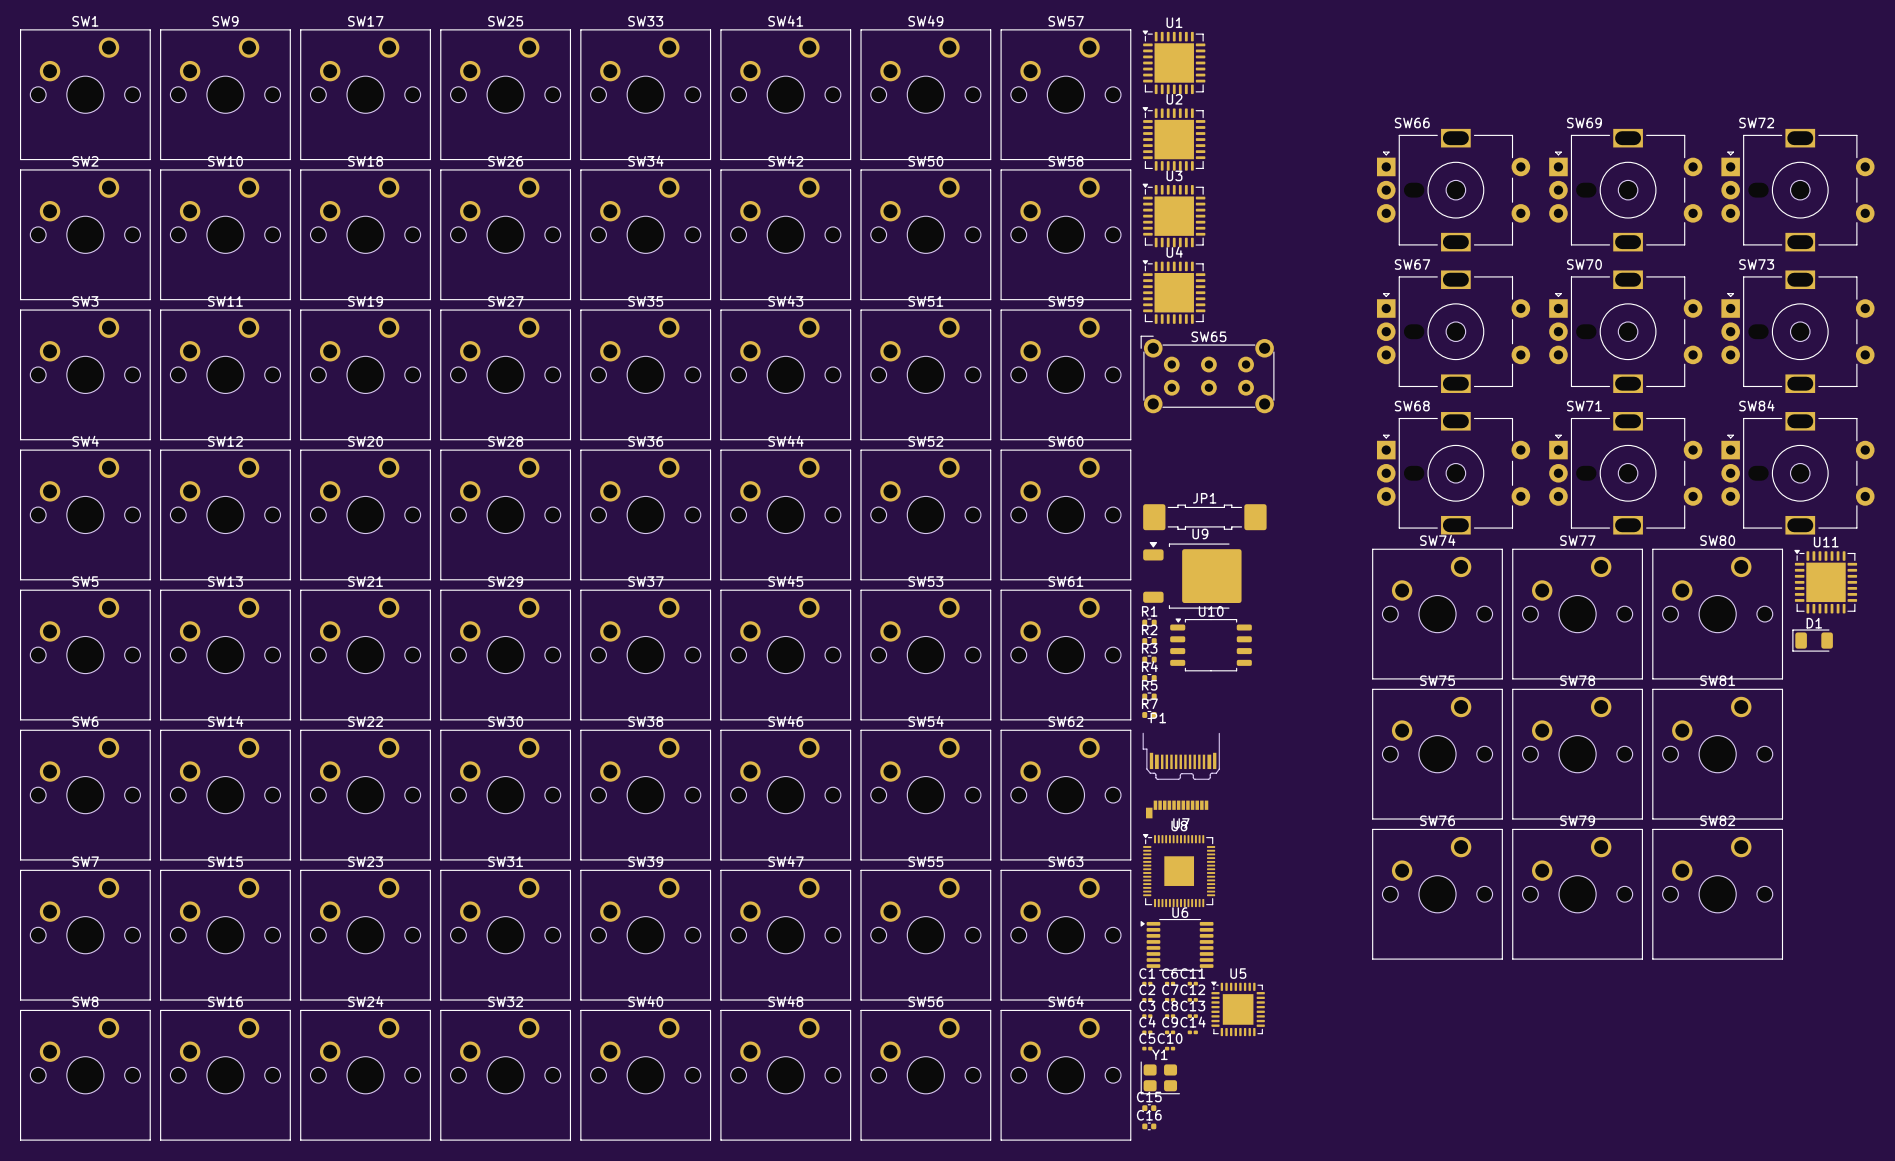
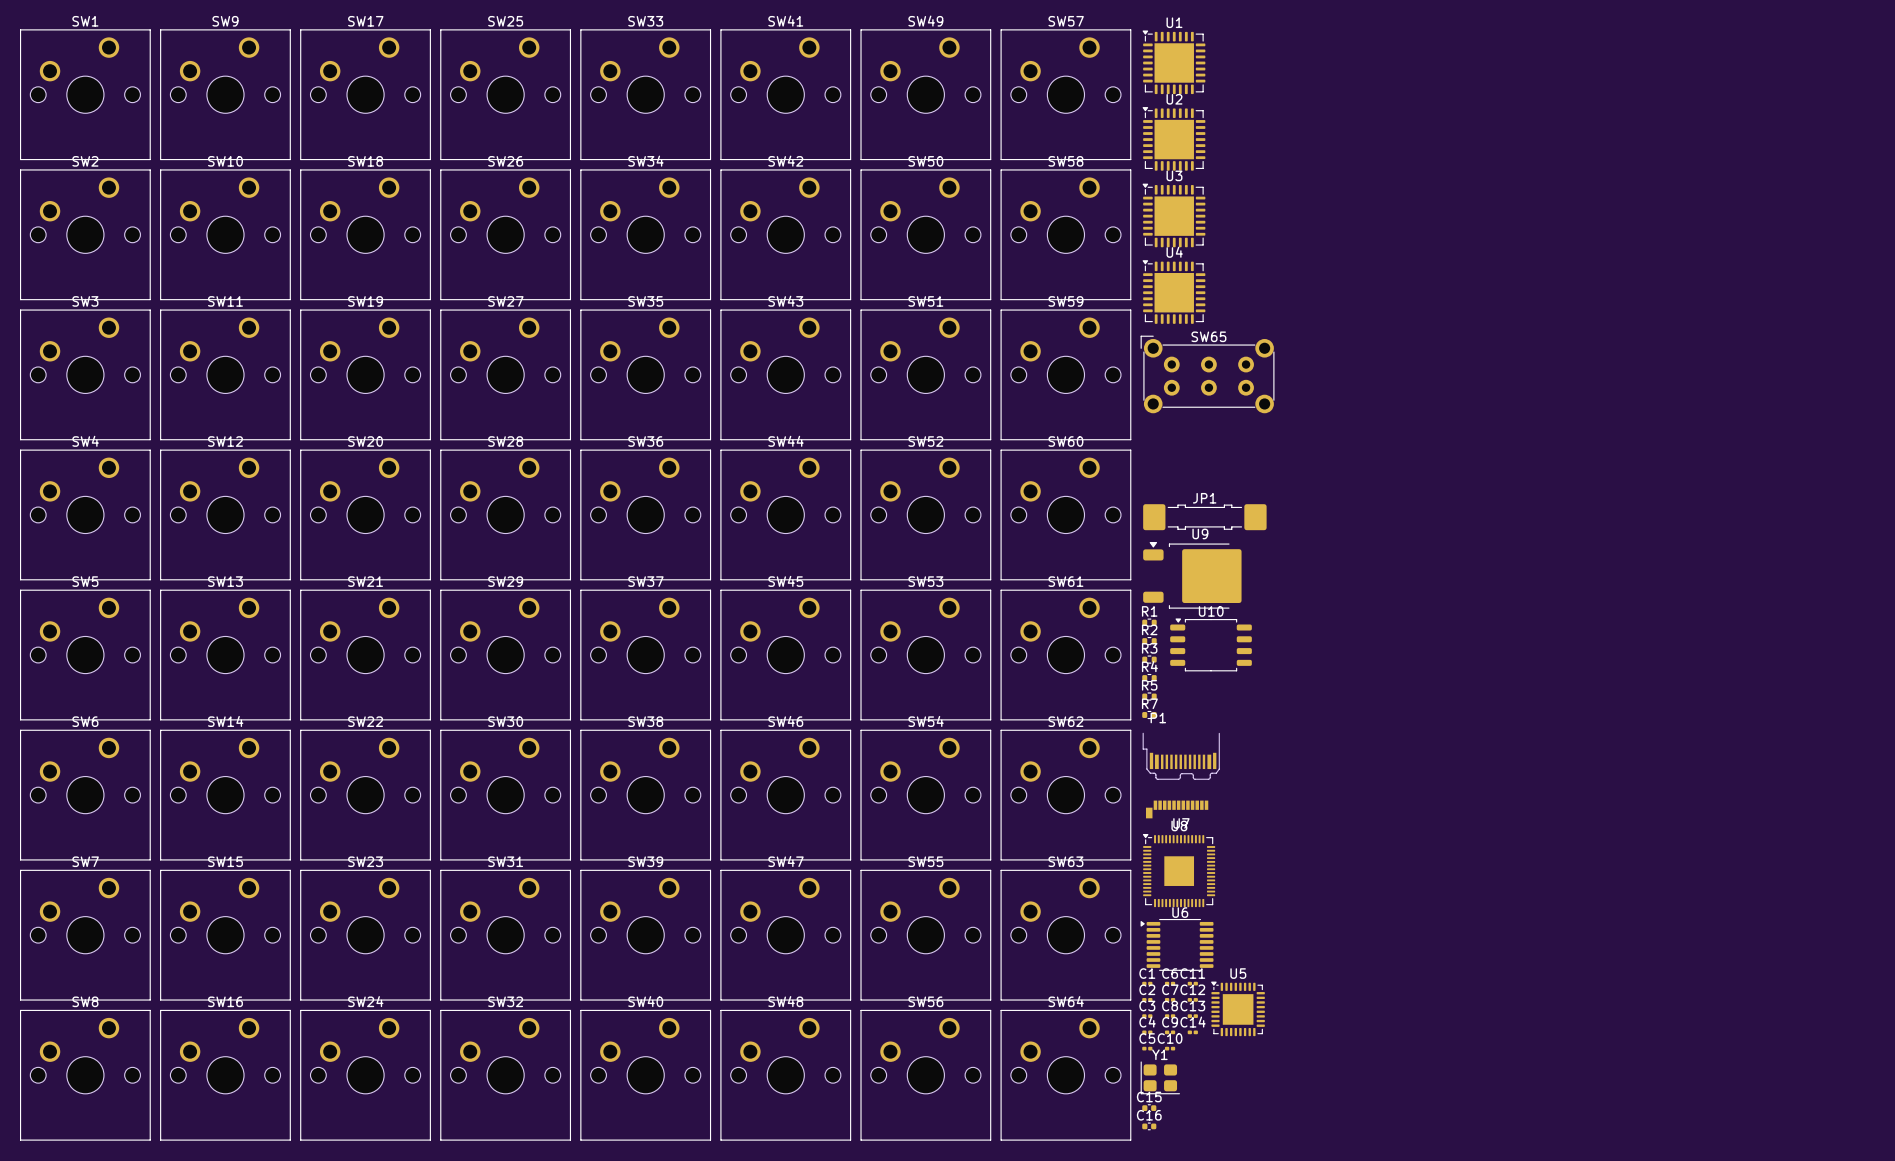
SW66: (1453, 190) -> none
SW69: (1625, 190) -> none
SW72: (1797, 190) -> none
SW67: (1453, 331) -> none
SW70: (1625, 331) -> none
SW73: (1797, 331) -> none
SW68: (1453, 473) -> none
SW71: (1625, 473) -> none
SW84: (1797, 473) -> none
U11: (1825, 581) -> none
SW74: (1437, 614) -> none
SW77: (1577, 614) -> none
SW80: (1717, 614) -> none
D1: (1812, 640) -> none
SW75: (1437, 754) -> none
SW78: (1577, 754) -> none
SW81: (1717, 754) -> none
SW76: (1437, 894) -> none
SW79: (1577, 894) -> none
SW82: (1717, 894) -> none

